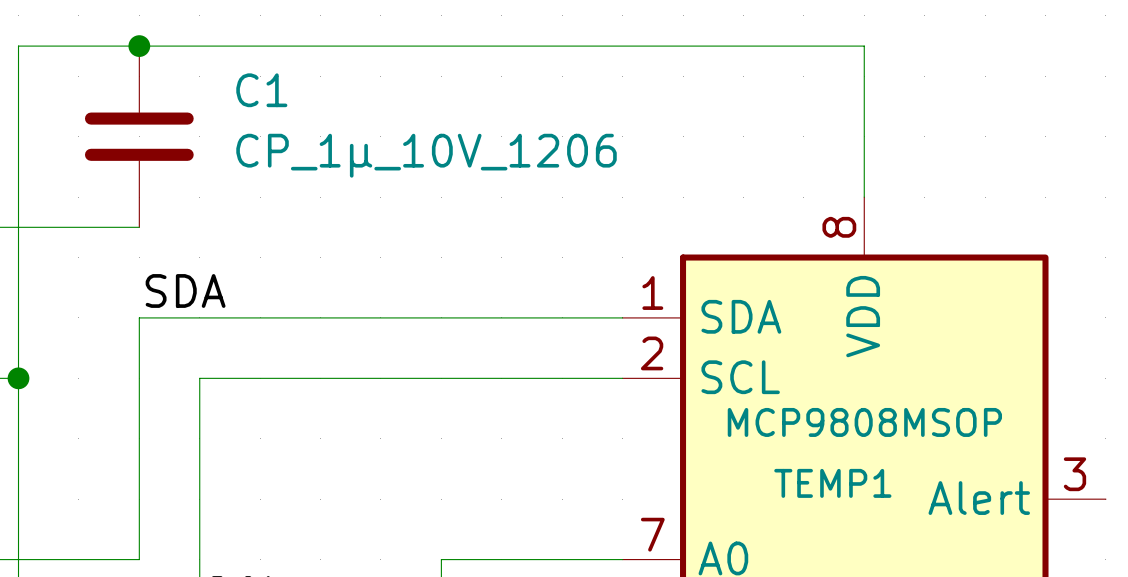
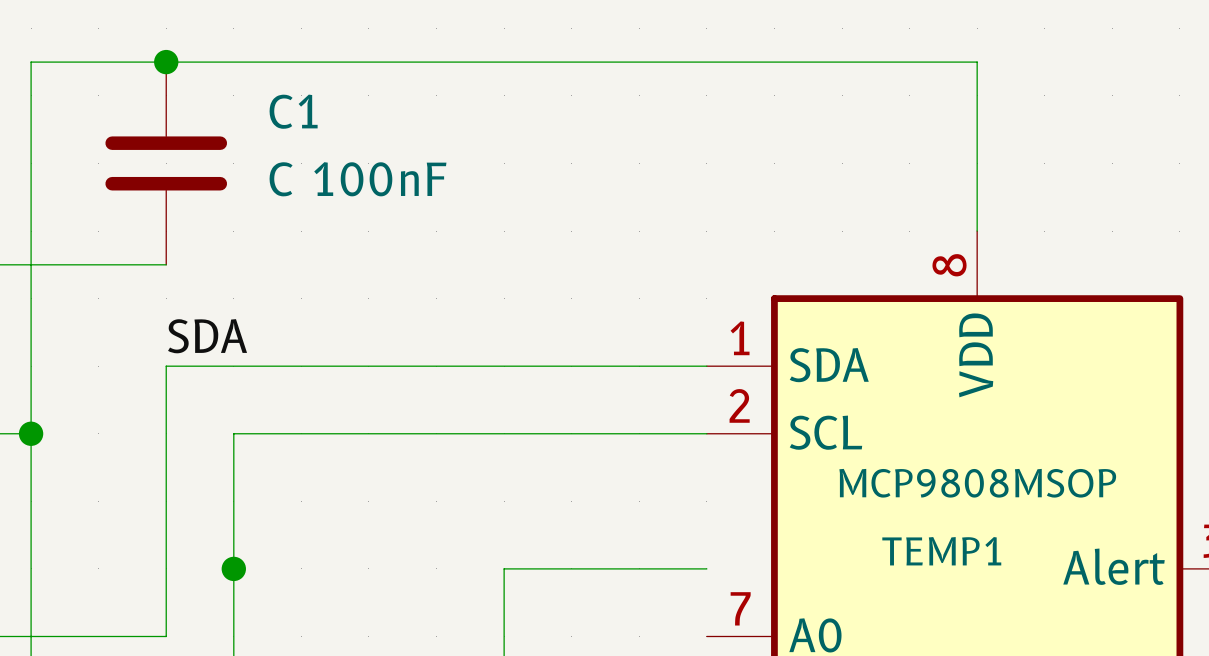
C1 value: CP_1µ_10V_1206 (426, 155) -> C 100nF (358, 179)
junction: none -> (233, 568)
wire: (441, 559) (622, 559) -> (504, 636) (504, 568) (706, 568)

